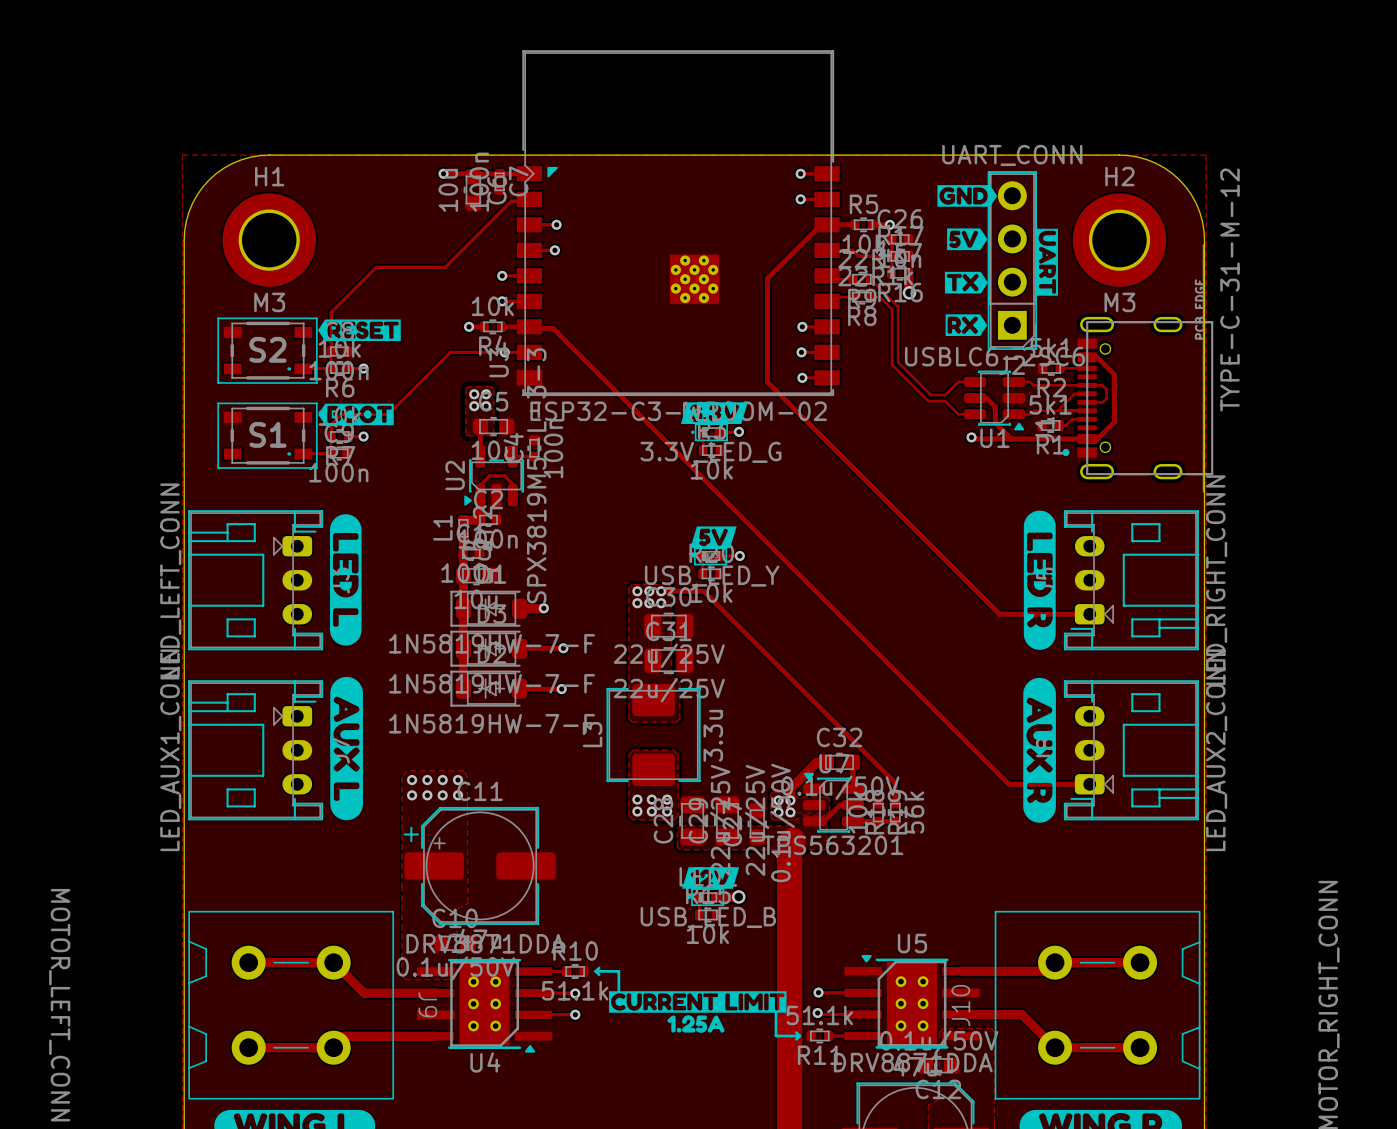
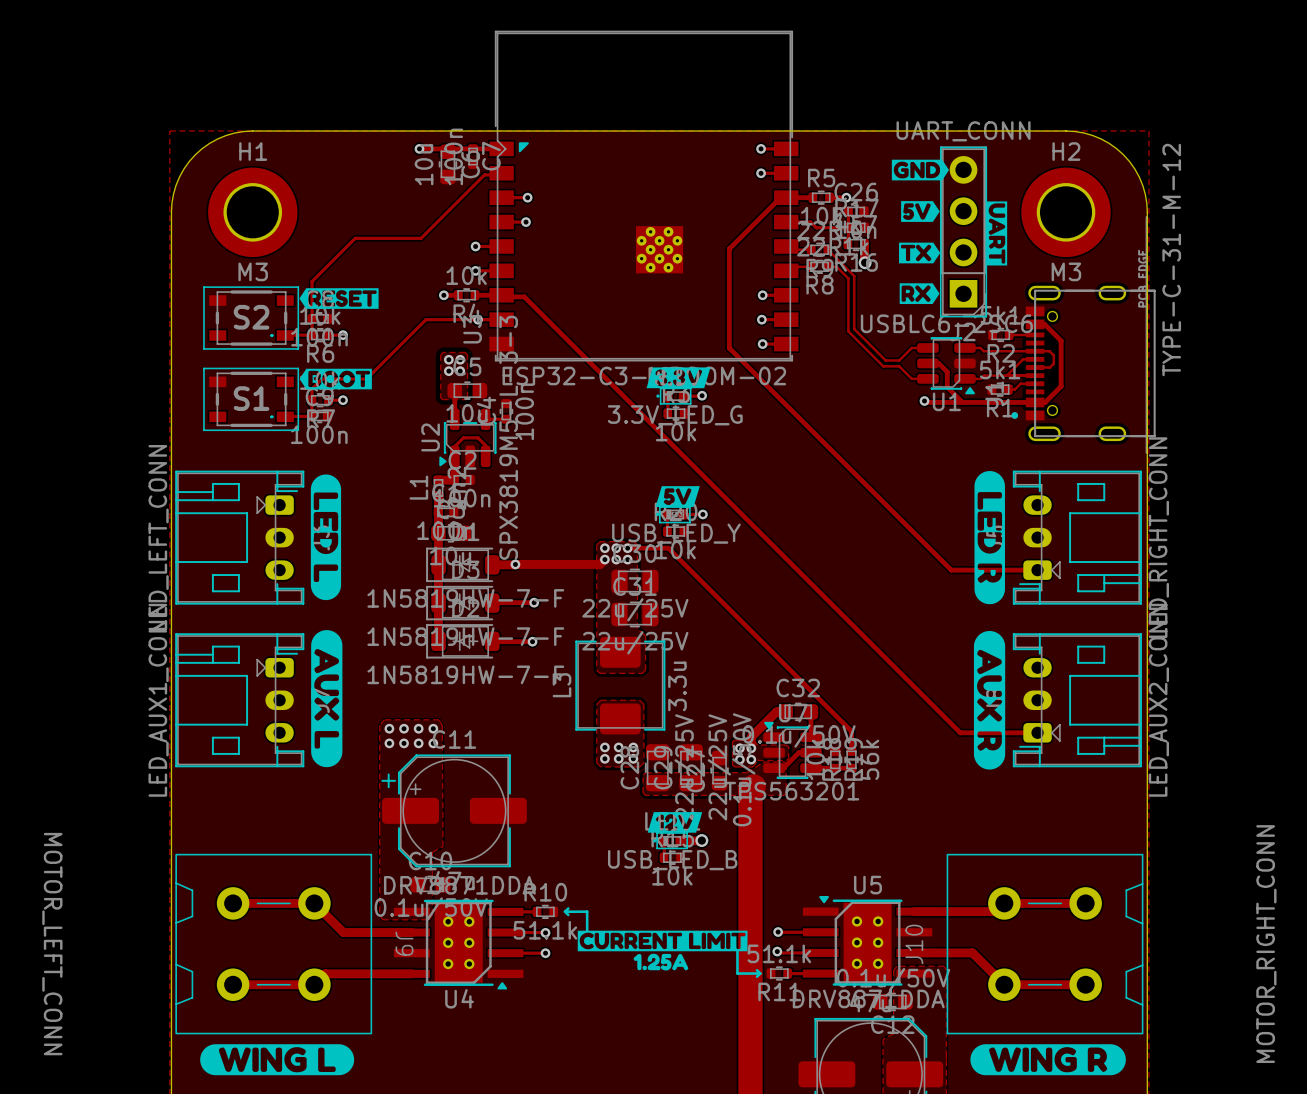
track: none -> (604, 559) (600, 564) (515, 564)

